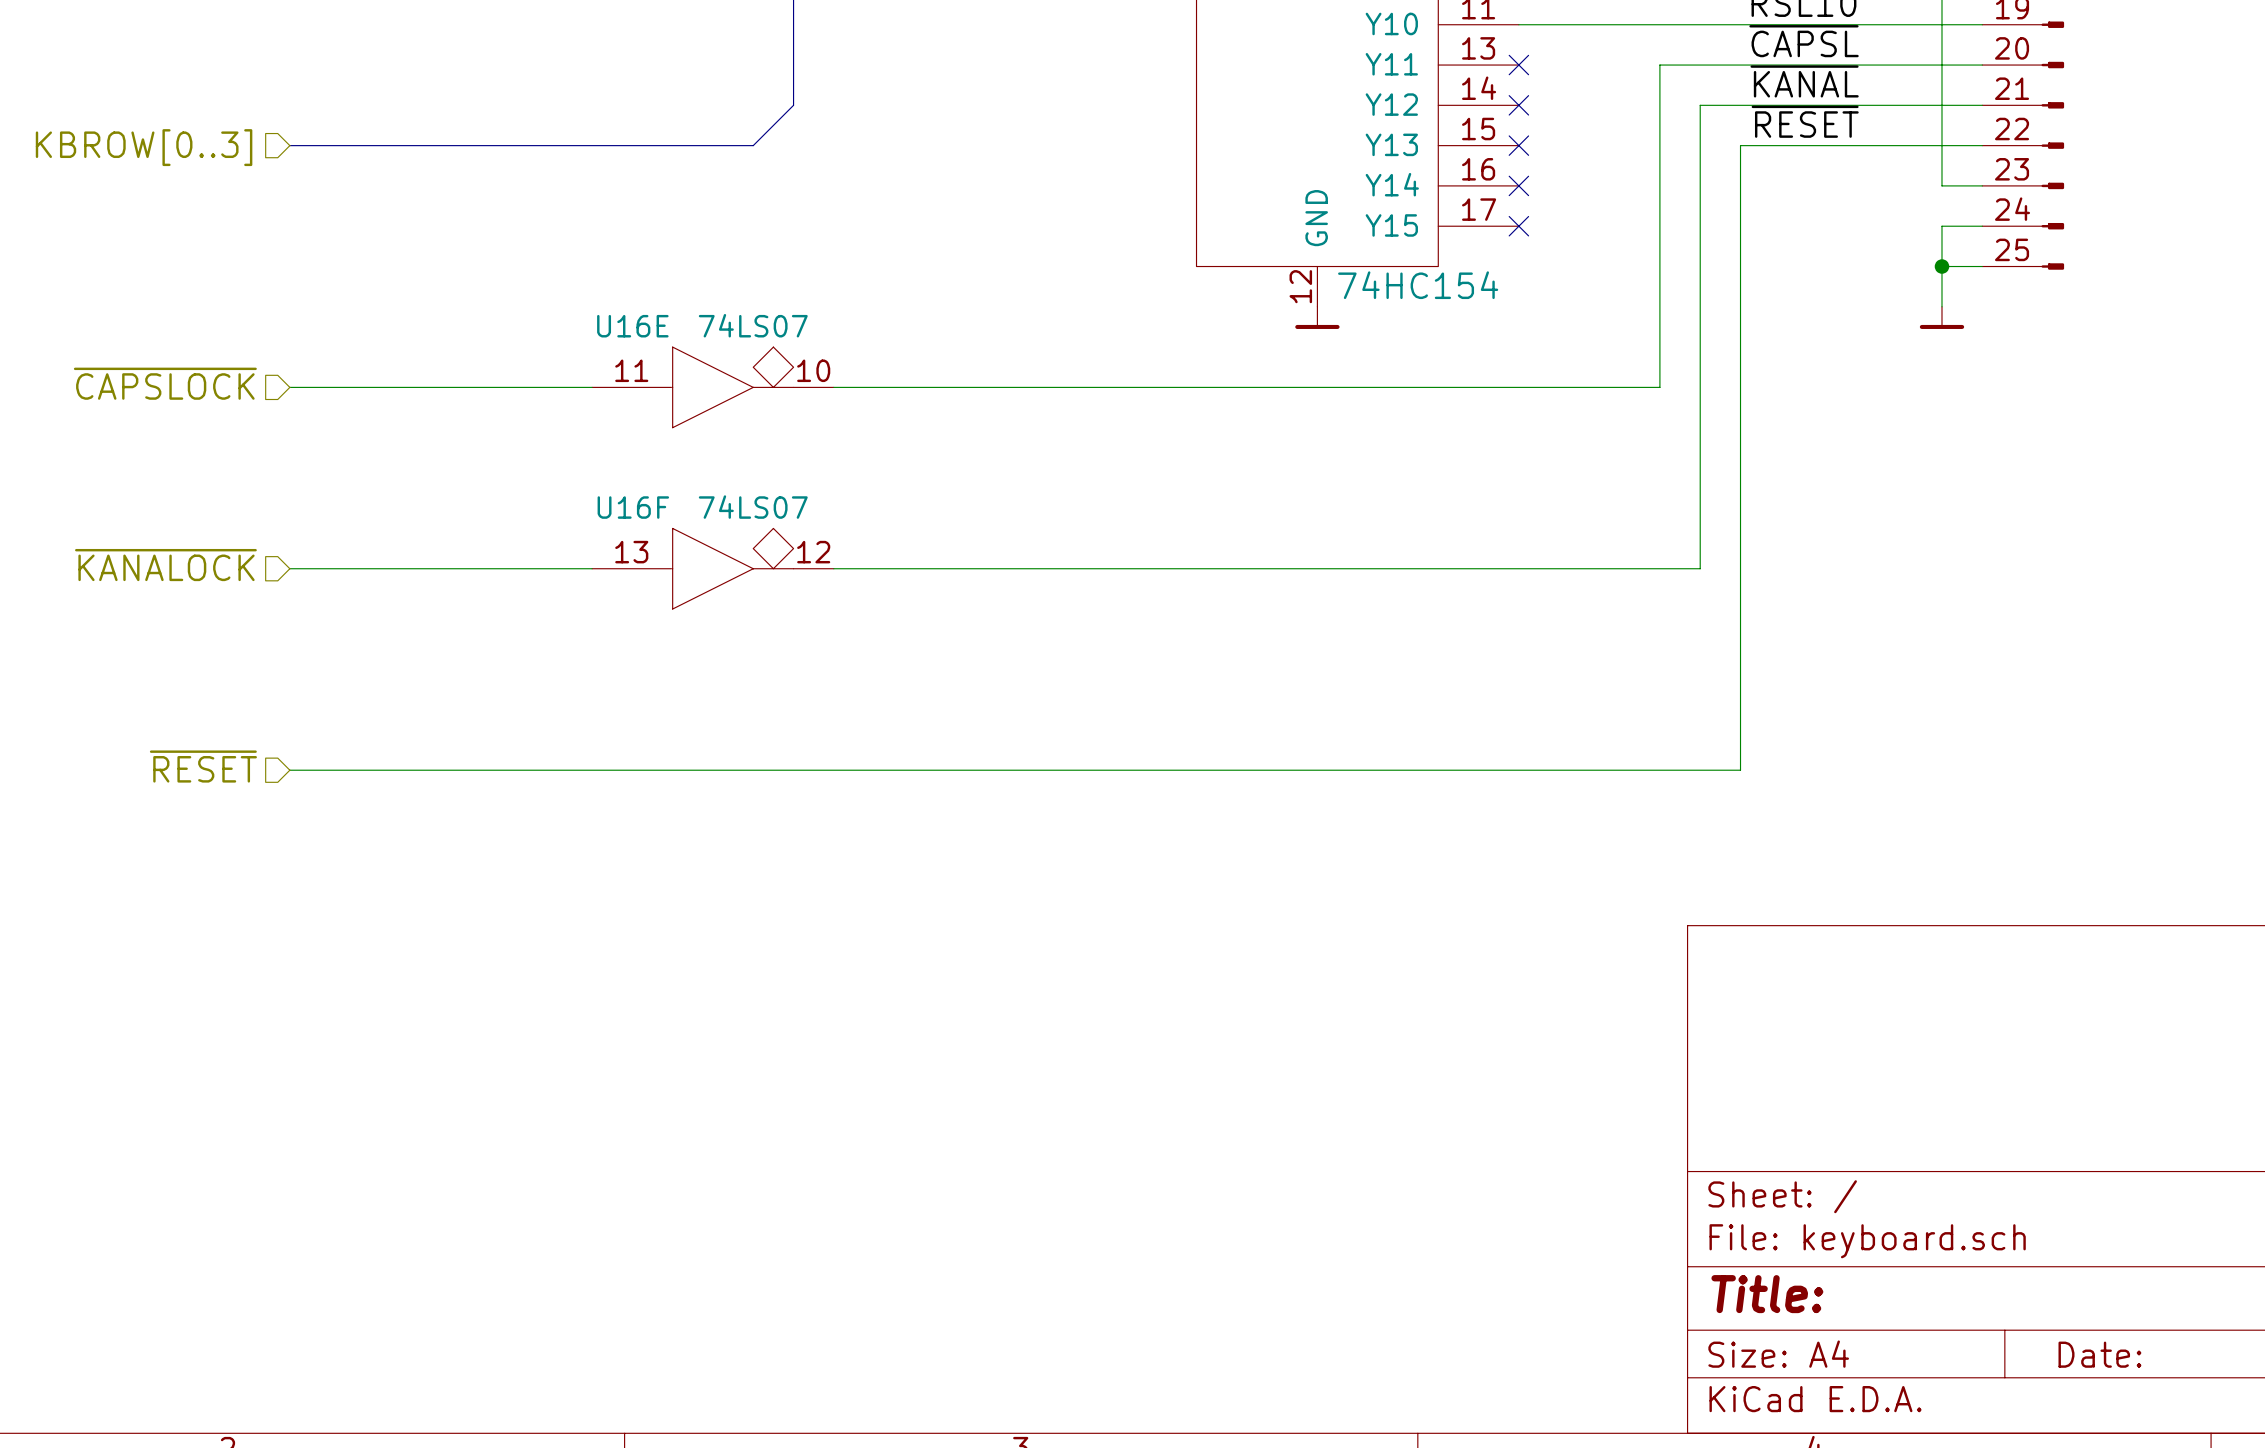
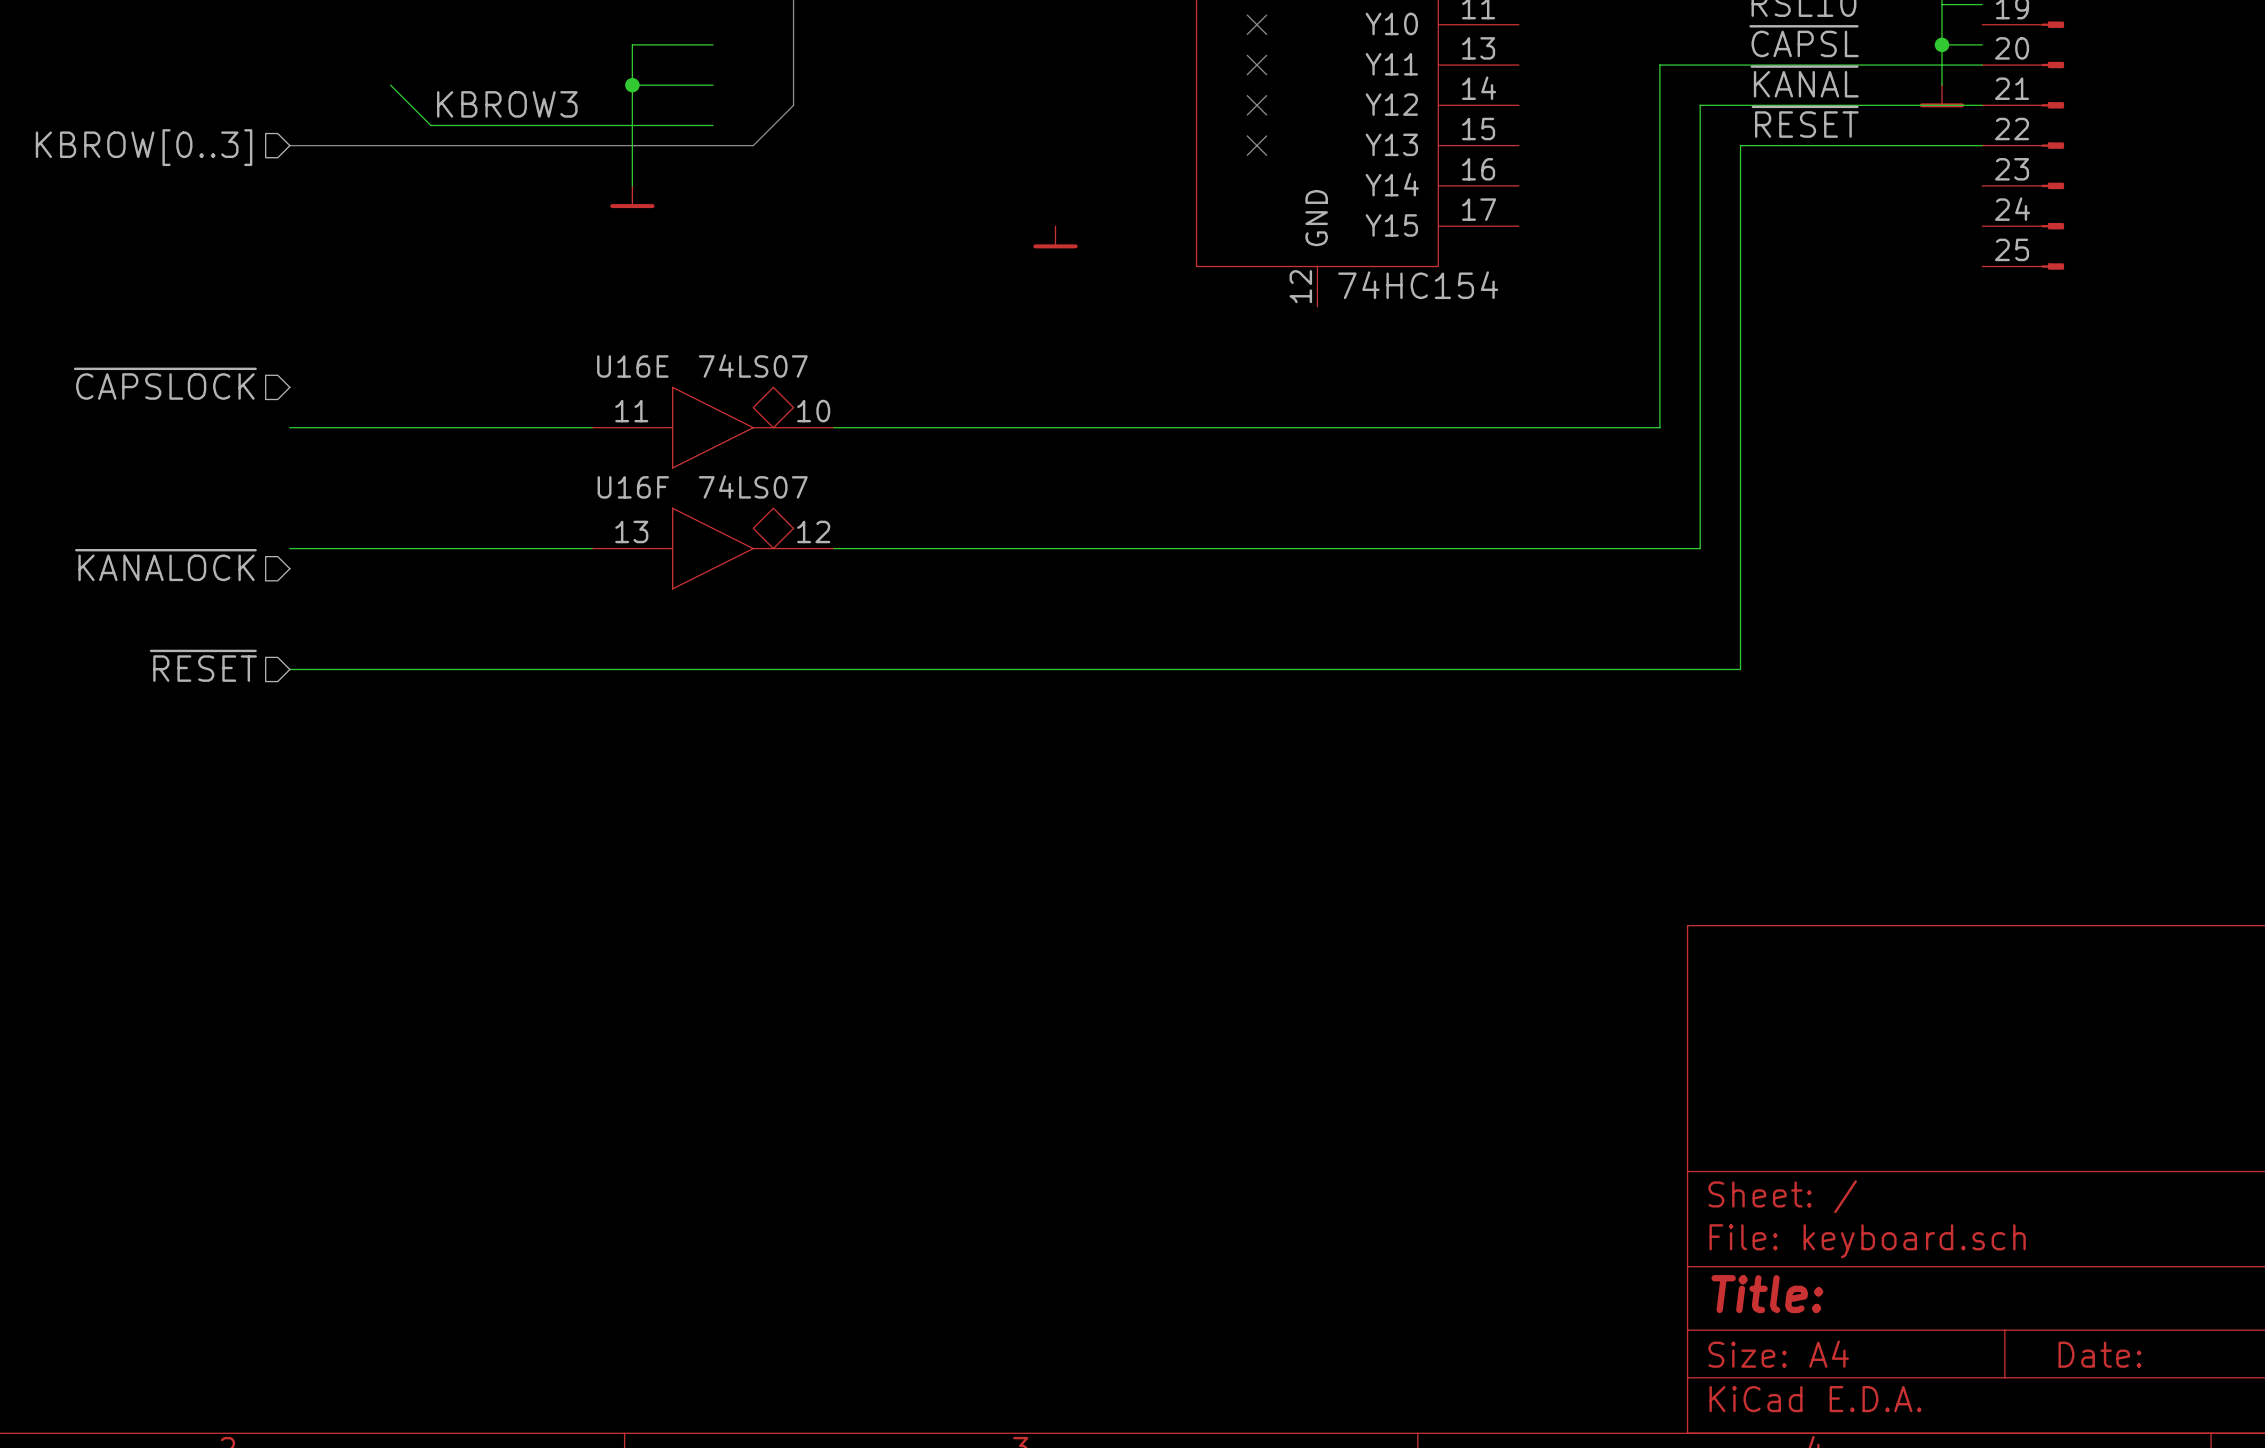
wire: none -> (1941, 4) (1982, 4)
no-connect mark: none -> (1256, 24)
wire: (1518, 24) (1982, 24) -> none
wire: none -> (712, 44) (632, 44) (632, 185)
junction: none -> (1941, 44)
no-connect mark: none -> (1256, 65)
no-connect mark: (1518, 65) -> none
wire: none -> (390, 85) (430, 125) (712, 125)
wire: none -> (632, 85) (712, 85)
junction: none -> (632, 85)
wire: (1941, 85) (1941, 185) (1982, 185) -> none
label: none -> KBROW3 (507, 104)
no-connect mark: none -> (1256, 105)
no-connect mark: (1518, 105) -> none
no-connect mark: none -> (1256, 145)
no-connect mark: (1518, 145) -> none
no-connect mark: (1518, 185) -> none
power symbol: none -> (632, 197)
no-connect mark: (1518, 226) -> none
wire: (1982, 226) (1941, 226) (1941, 306) -> none
power symbol: none -> (1055, 237)
wire: (1941, 266) (1982, 266) -> (1941, 44) (1982, 44)
junction: (1941, 266) -> none
power symbol: (1317, 317) -> none
power symbol position: (1941, 317) -> (1941, 96)
wire: (289, 387) (592, 387) -> (289, 548) (592, 548)
U16E position: (712, 387) -> (712, 427)
wire: (833, 387) (1659, 387) -> (833, 427) (1659, 427) (1659, 387)
wire: (1700, 548) (1700, 568) (833, 568) -> (1700, 548) (833, 548)
wire: (289, 568) (592, 568) -> (289, 427) (592, 427)
U16F position: (712, 568) -> (712, 548)
wire: (1740, 669) (1740, 770) (289, 770) -> (1740, 669) (289, 669)
hierarchical label position: ~{RESET} (203, 766) -> ~{RESET} (203, 665)

